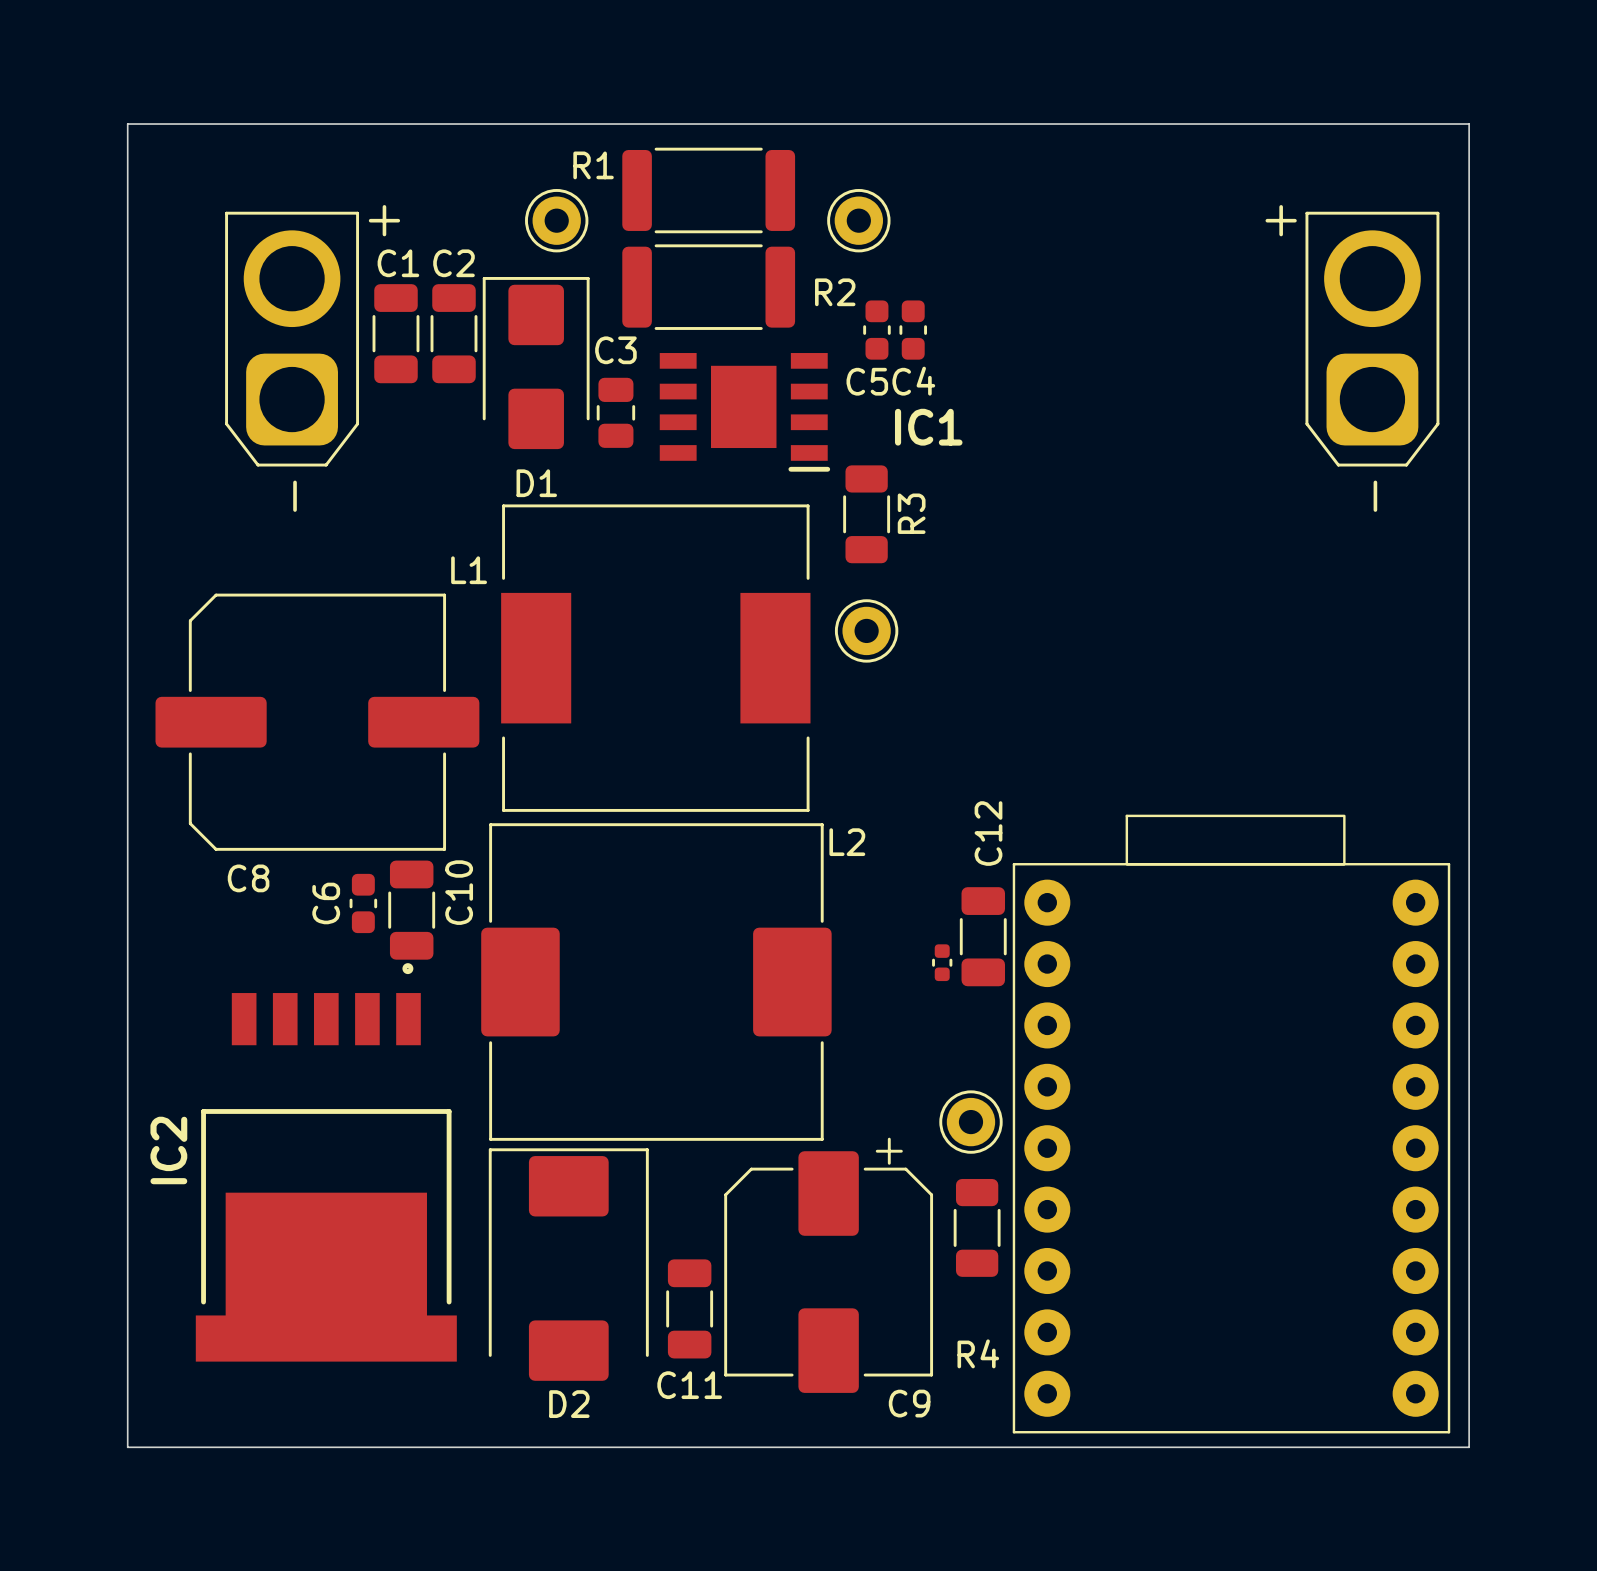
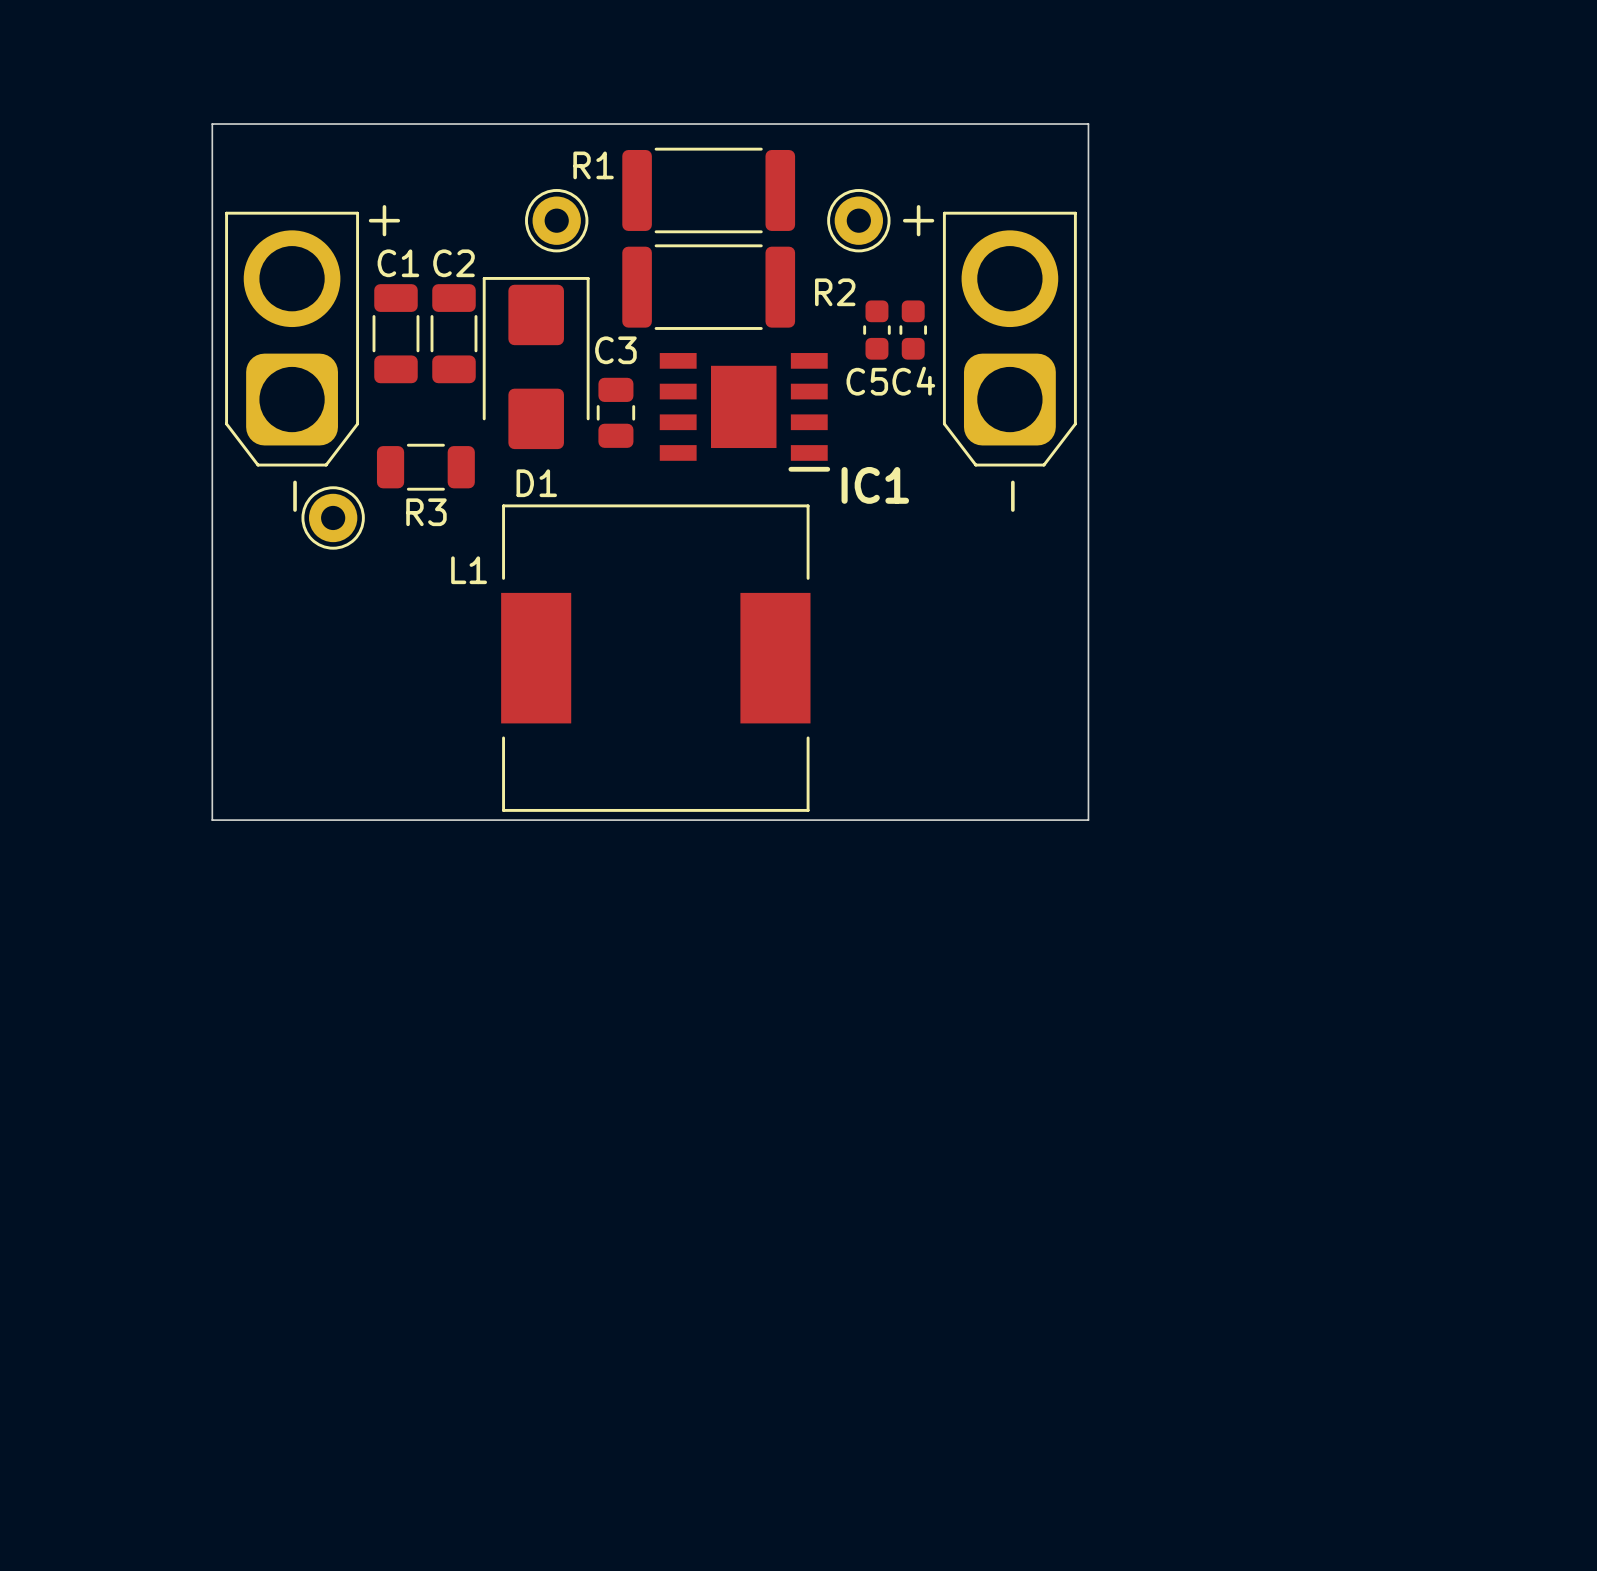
board edge: (212, 124) (127, 124) (127, 1447) (1469, 1447) (1469, 124) (1088, 124) -> (212, 124) (212, 820) (1088, 820) (1088, 124)
part position: (1372, 339) -> (1009, 339)
IC1 name position: IC1 (928, 427) -> IC1 (875, 485)
R3 rotation: 0° (866, 514) -> 90° clockwise (425, 467)
R3 position: (866, 514) -> (425, 467)
part: none -> (333, 517)
part: (866, 630) -> none
C8: (317, 722) -> none
C6: (363, 903) -> none
C10: (411, 910) -> none
C12: (983, 936) -> none
part: (942, 962) -> none
L2: (656, 982) -> none
part: (970, 1122) -> none
part: (1231, 1124) -> none
IC2: (326, 1162) -> none
R4: (977, 1227) -> none
D2: (568, 1264) -> none
C9: (828, 1265) -> none
C11: (689, 1308) -> none

